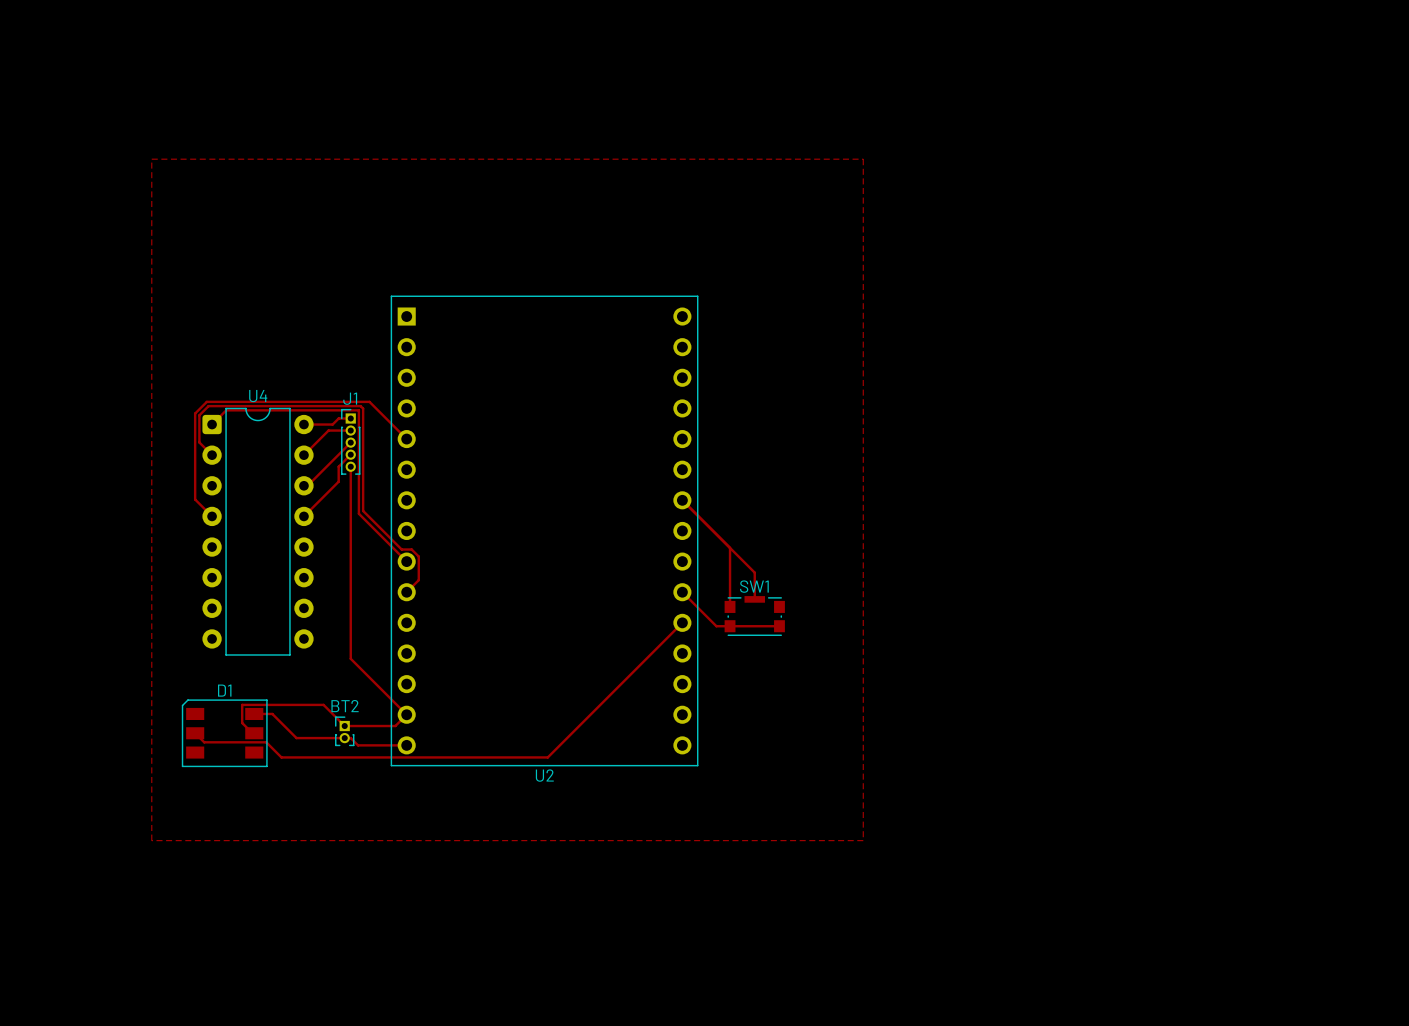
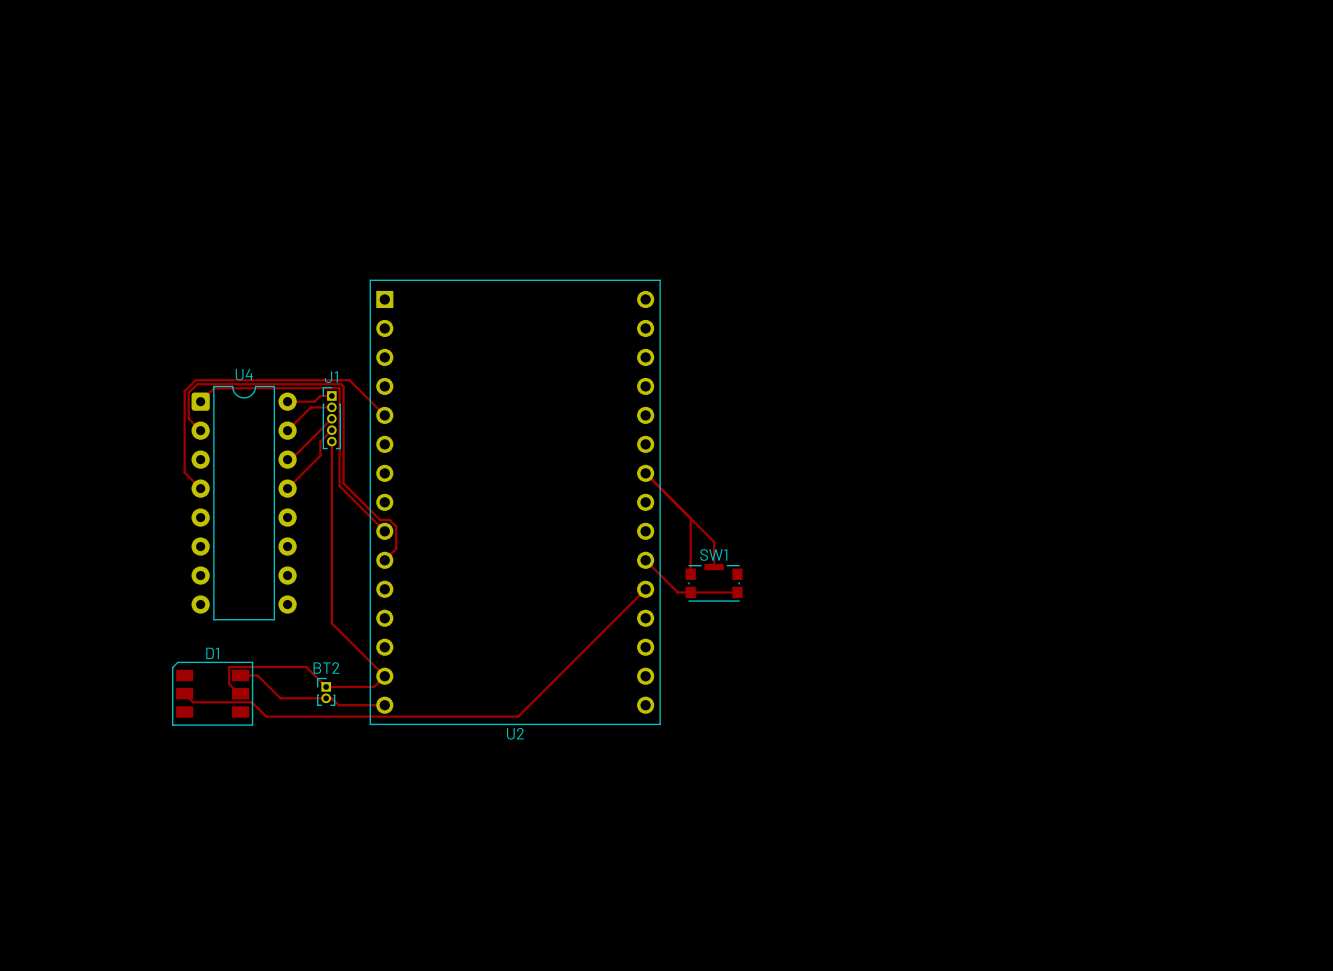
top zone outline: (151, 159) (863, 159) (863, 840) (151, 840) (151, 159) -> none

